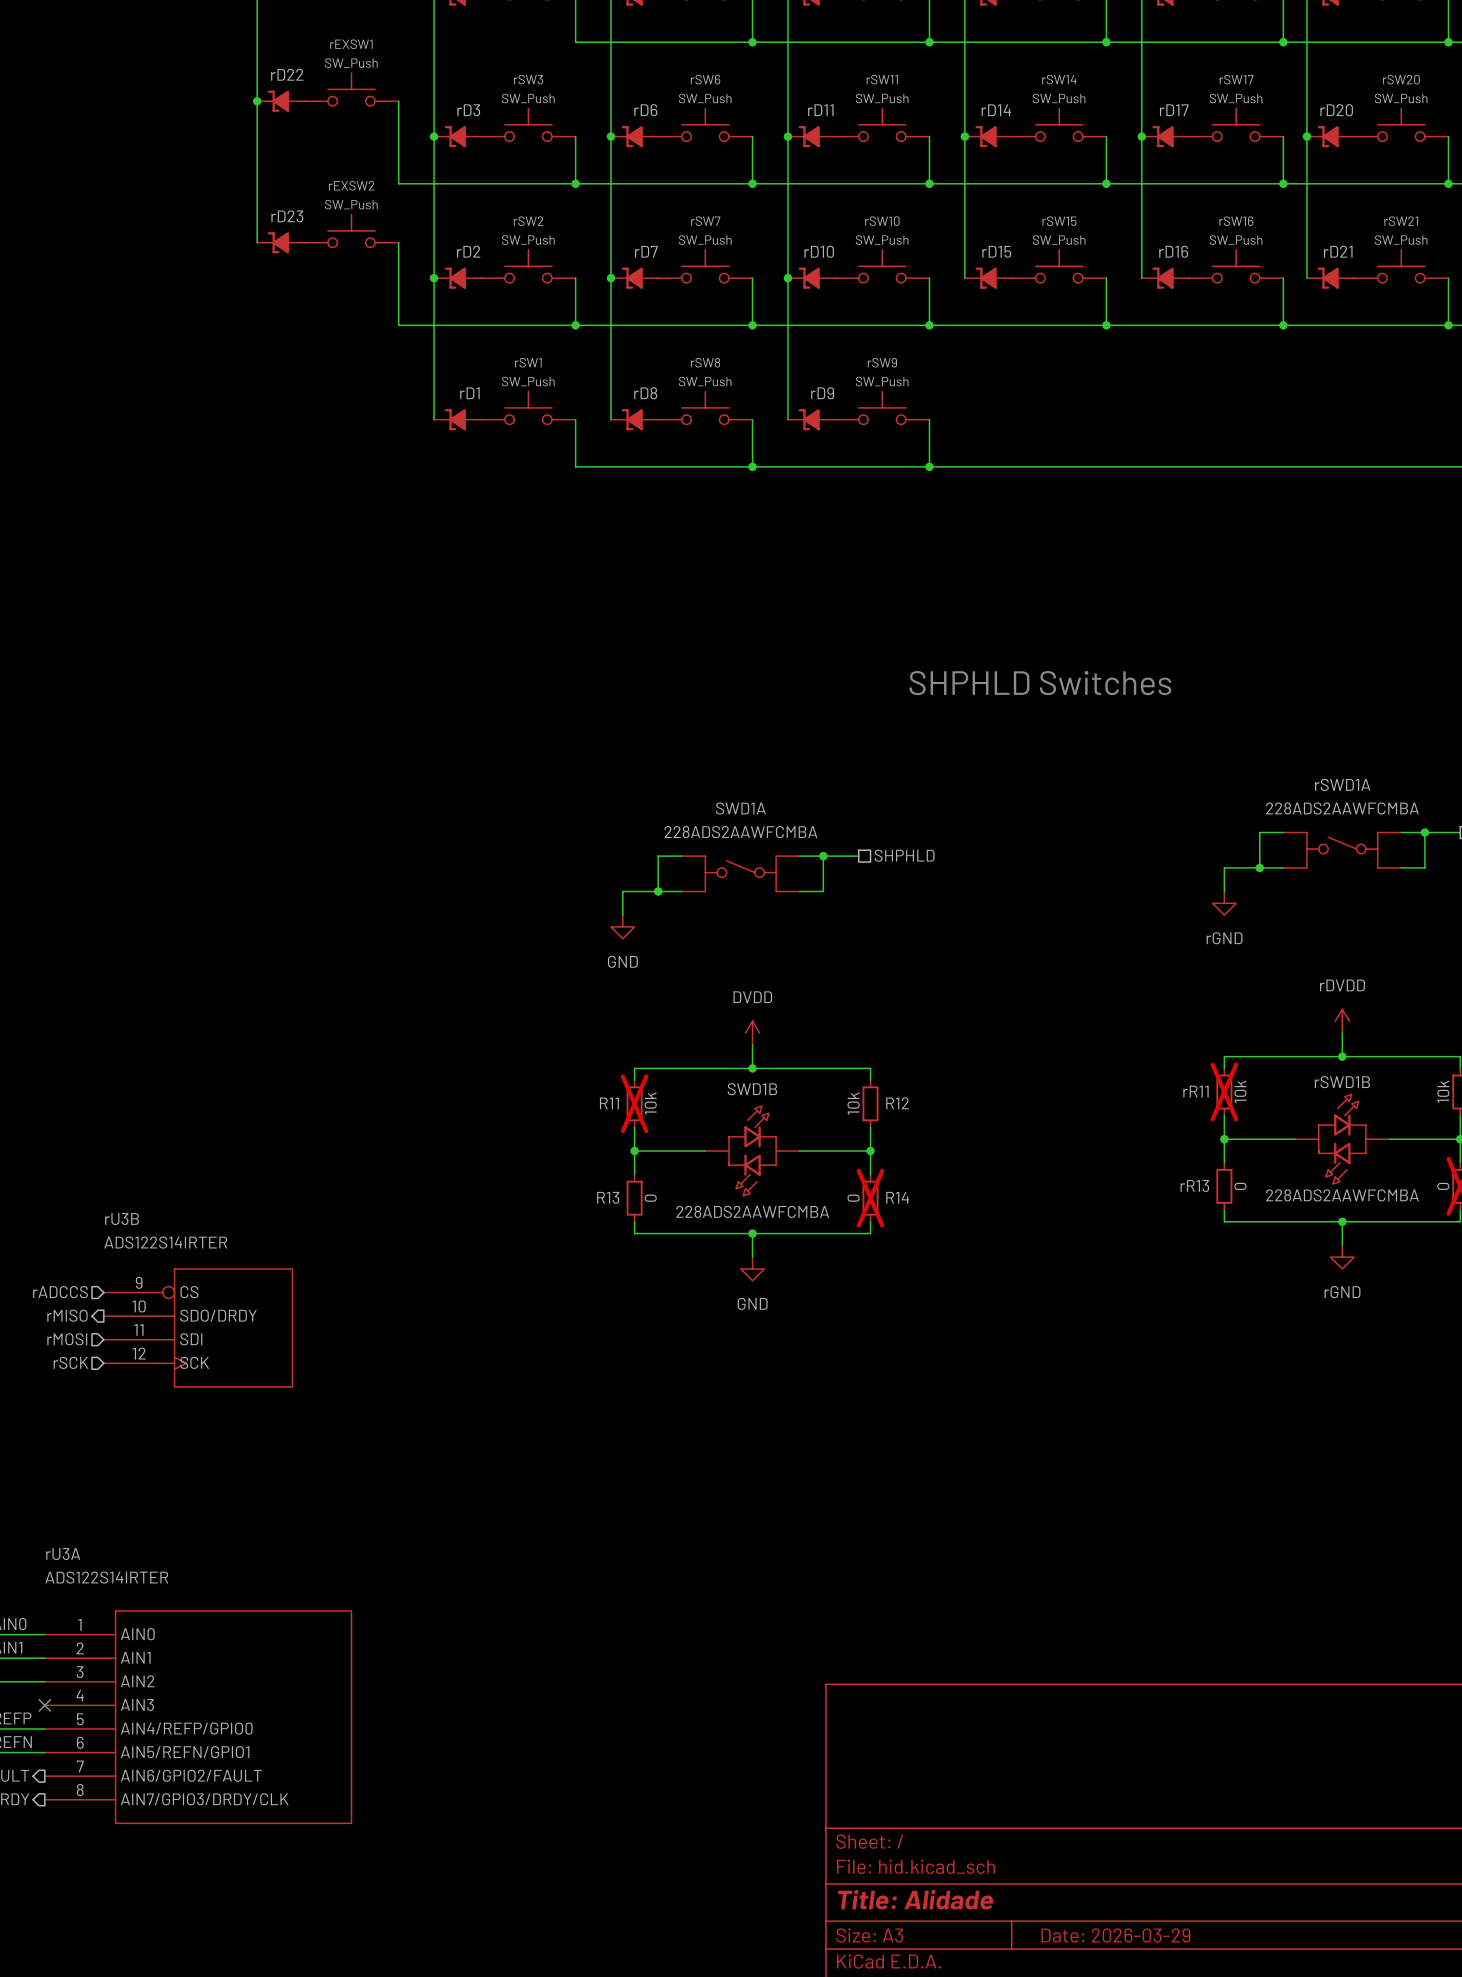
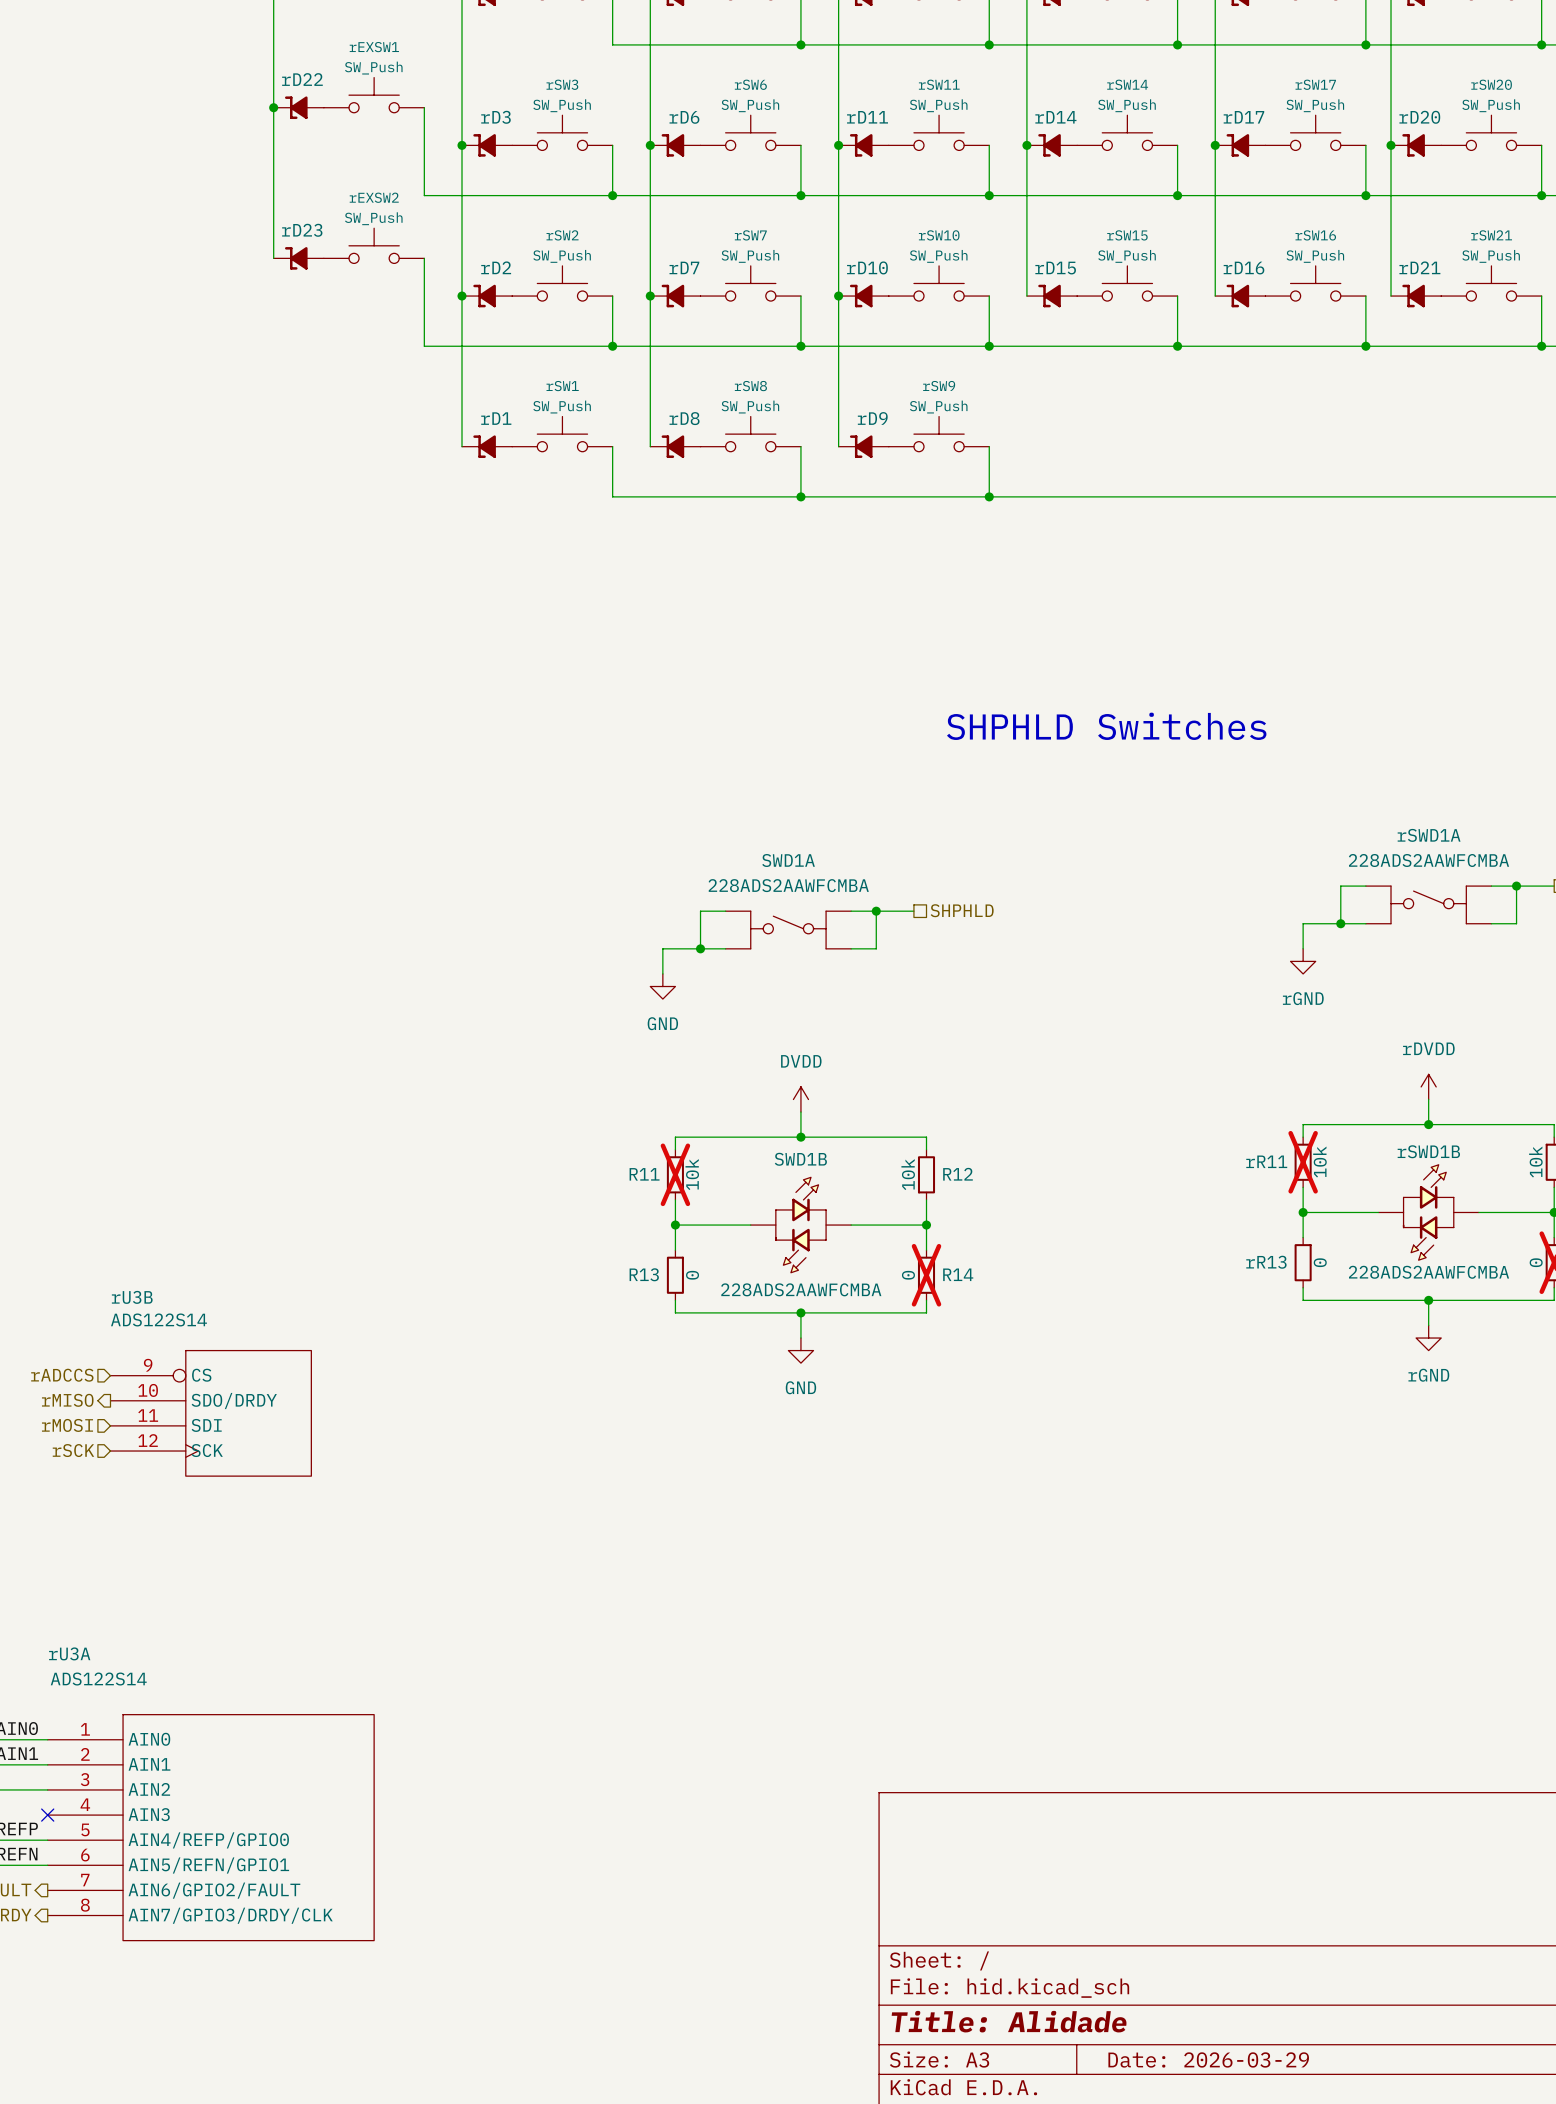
rU3B value: ADS122S14IRTER (165, 1242) -> ADS122S14 (158, 1319)
rU3A value: ADS122S14IRTER (106, 1577) -> ADS122S14 (98, 1679)

